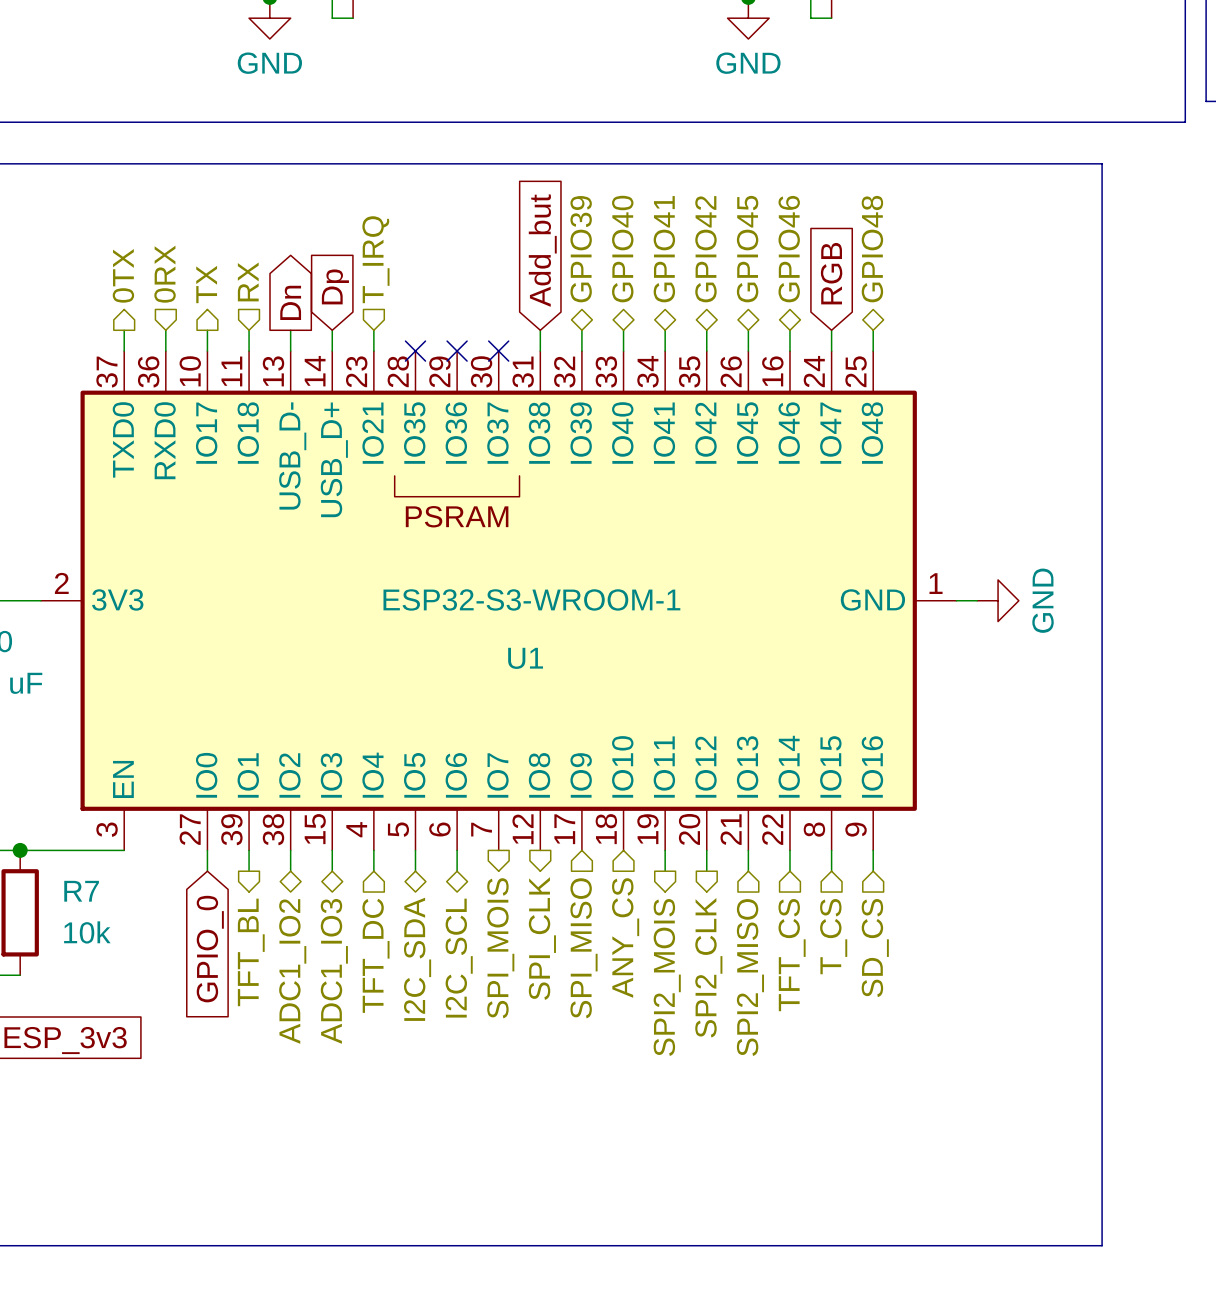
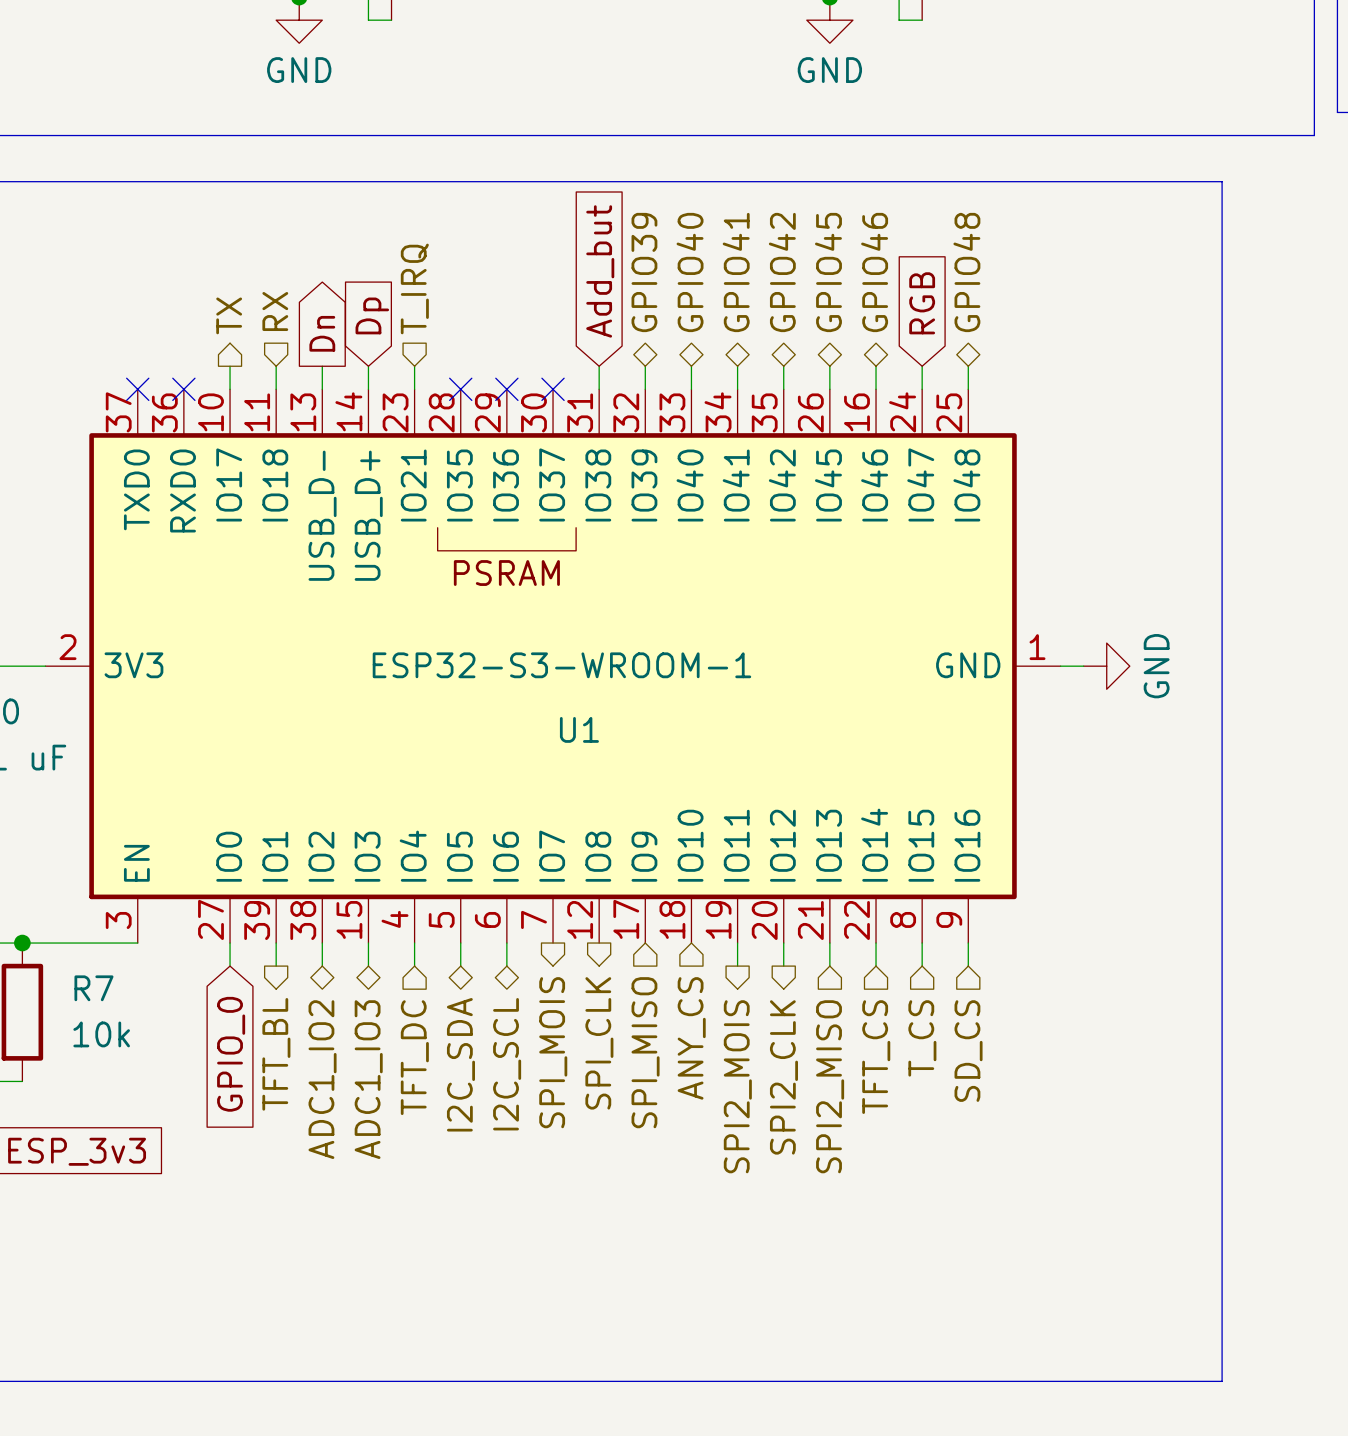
hierarchical label: 0RX (165, 274) -> none
hierarchical label: 0TX (123, 275) -> none
wire: (124, 330) (124, 351) -> none
wire: (165, 330) (165, 351) -> none
no-connect mark: none -> (137, 389)
no-connect mark: none -> (183, 389)

